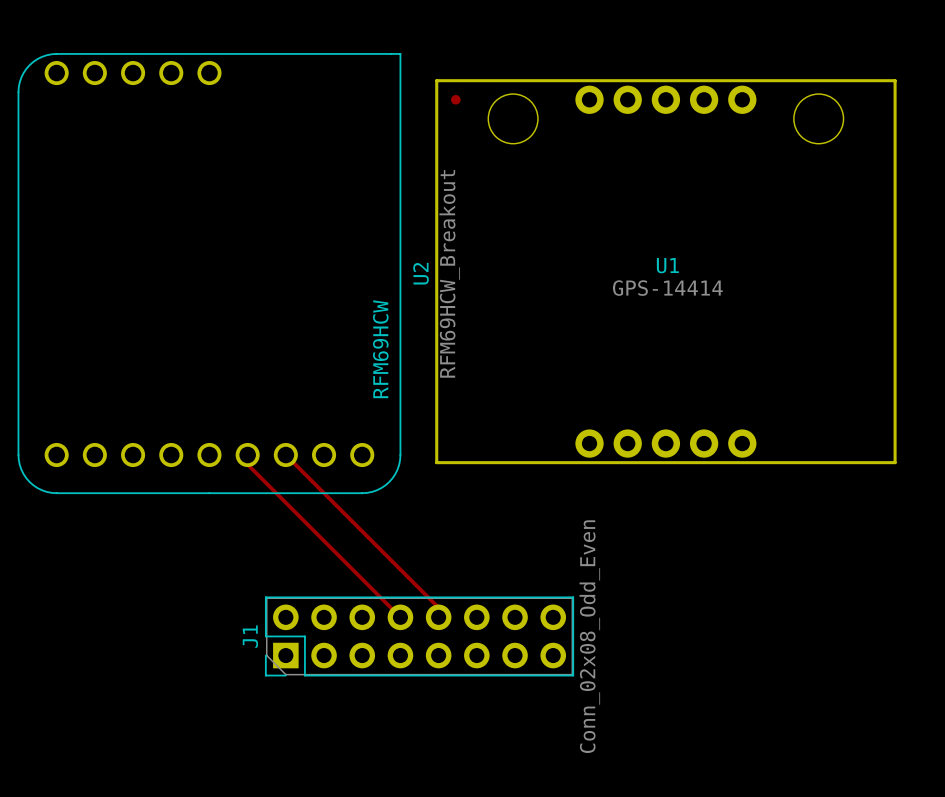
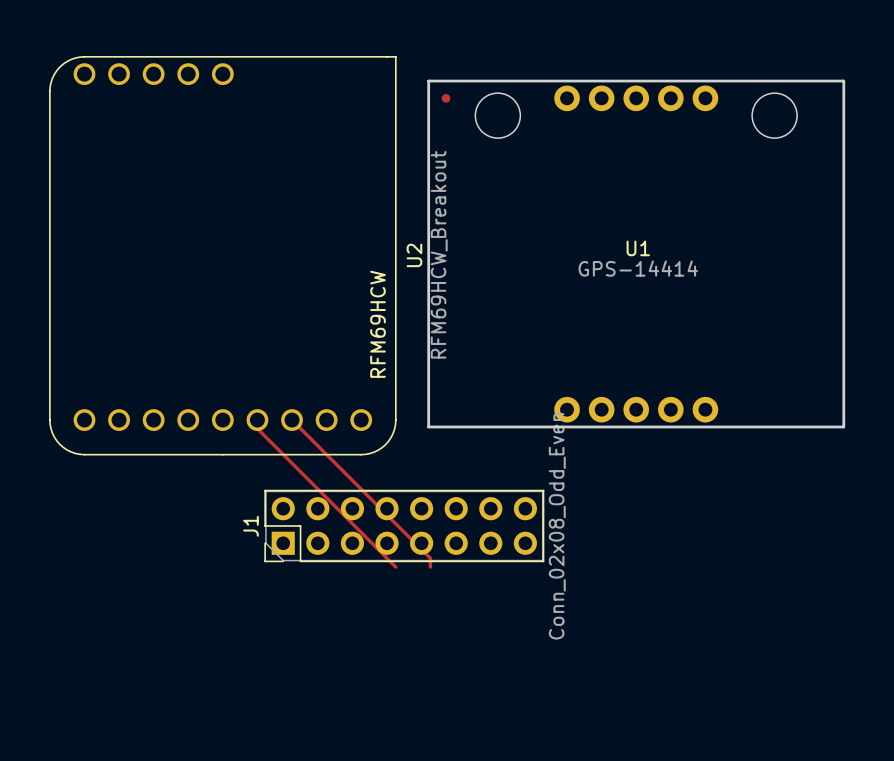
J1 position: (419, 636) -> (404, 525)

